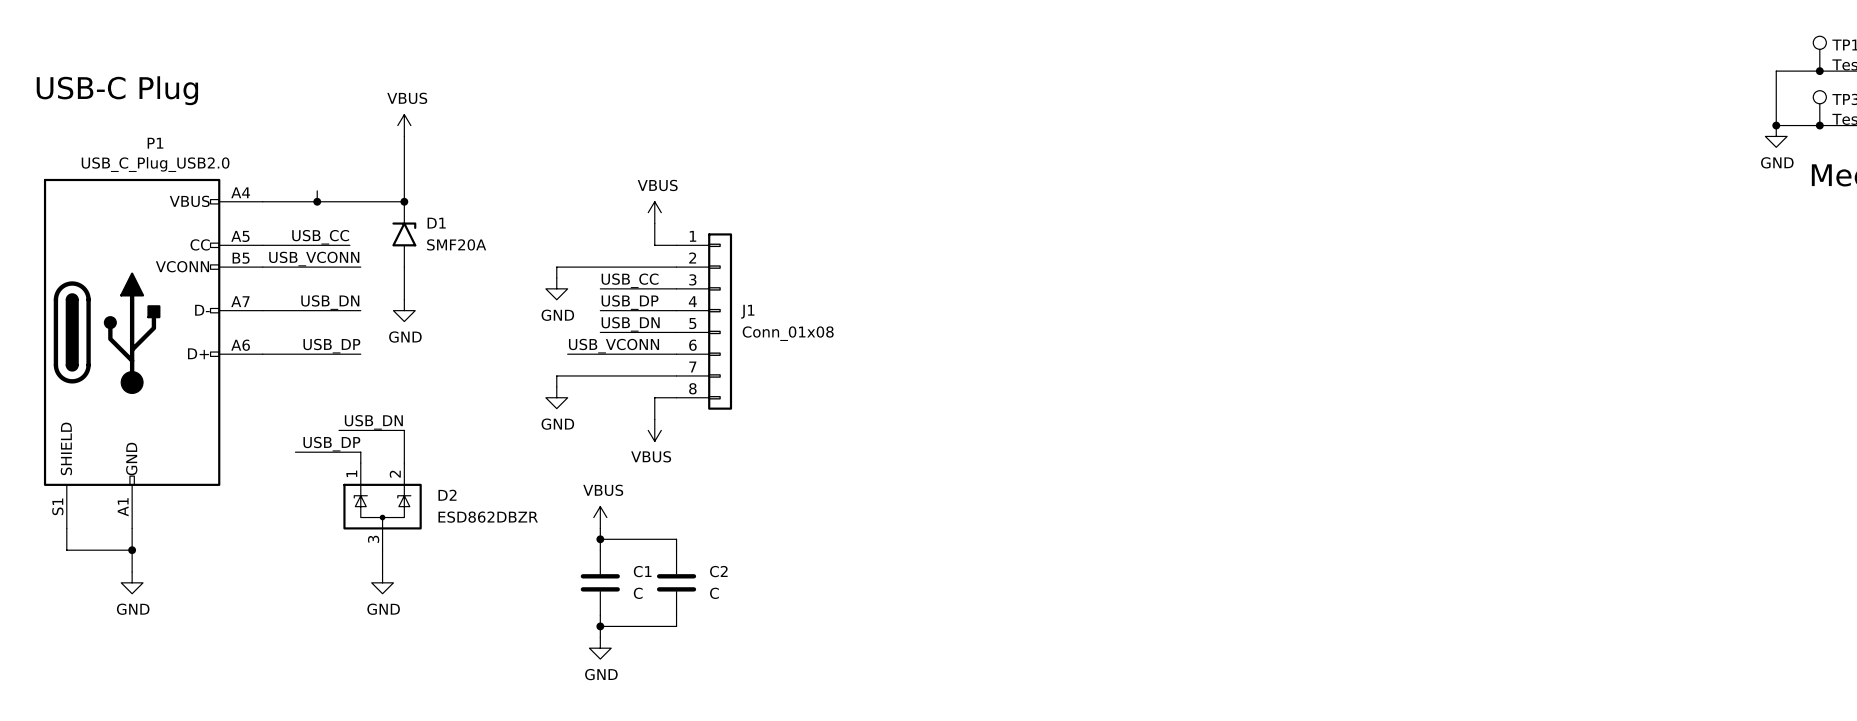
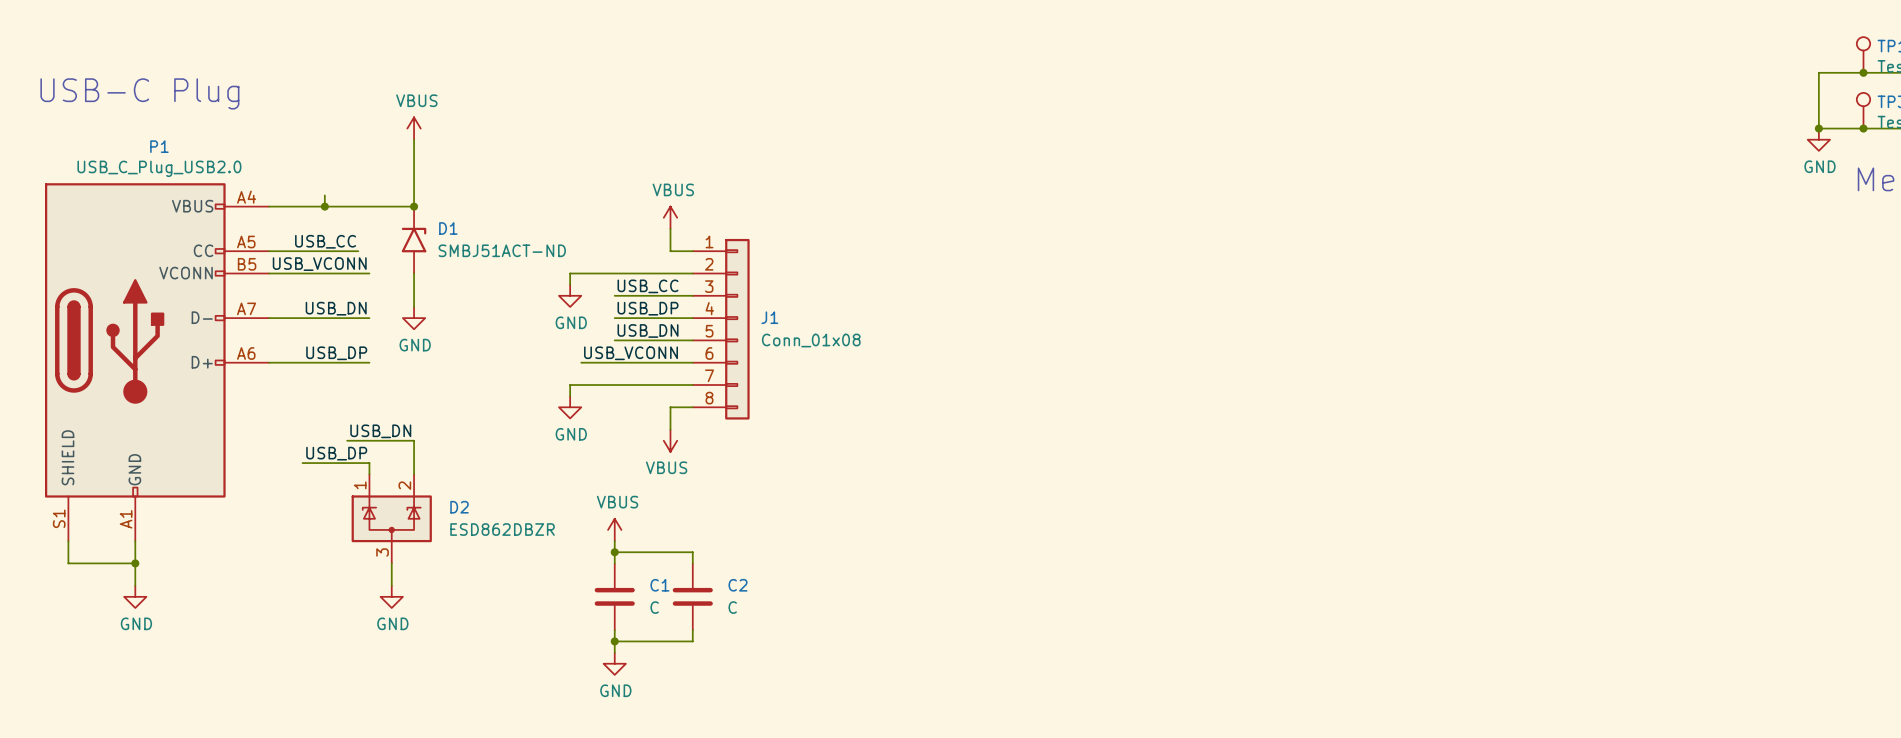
D1 value: SMF20A (456, 244) -> SMBJ51ACT-ND (502, 250)

